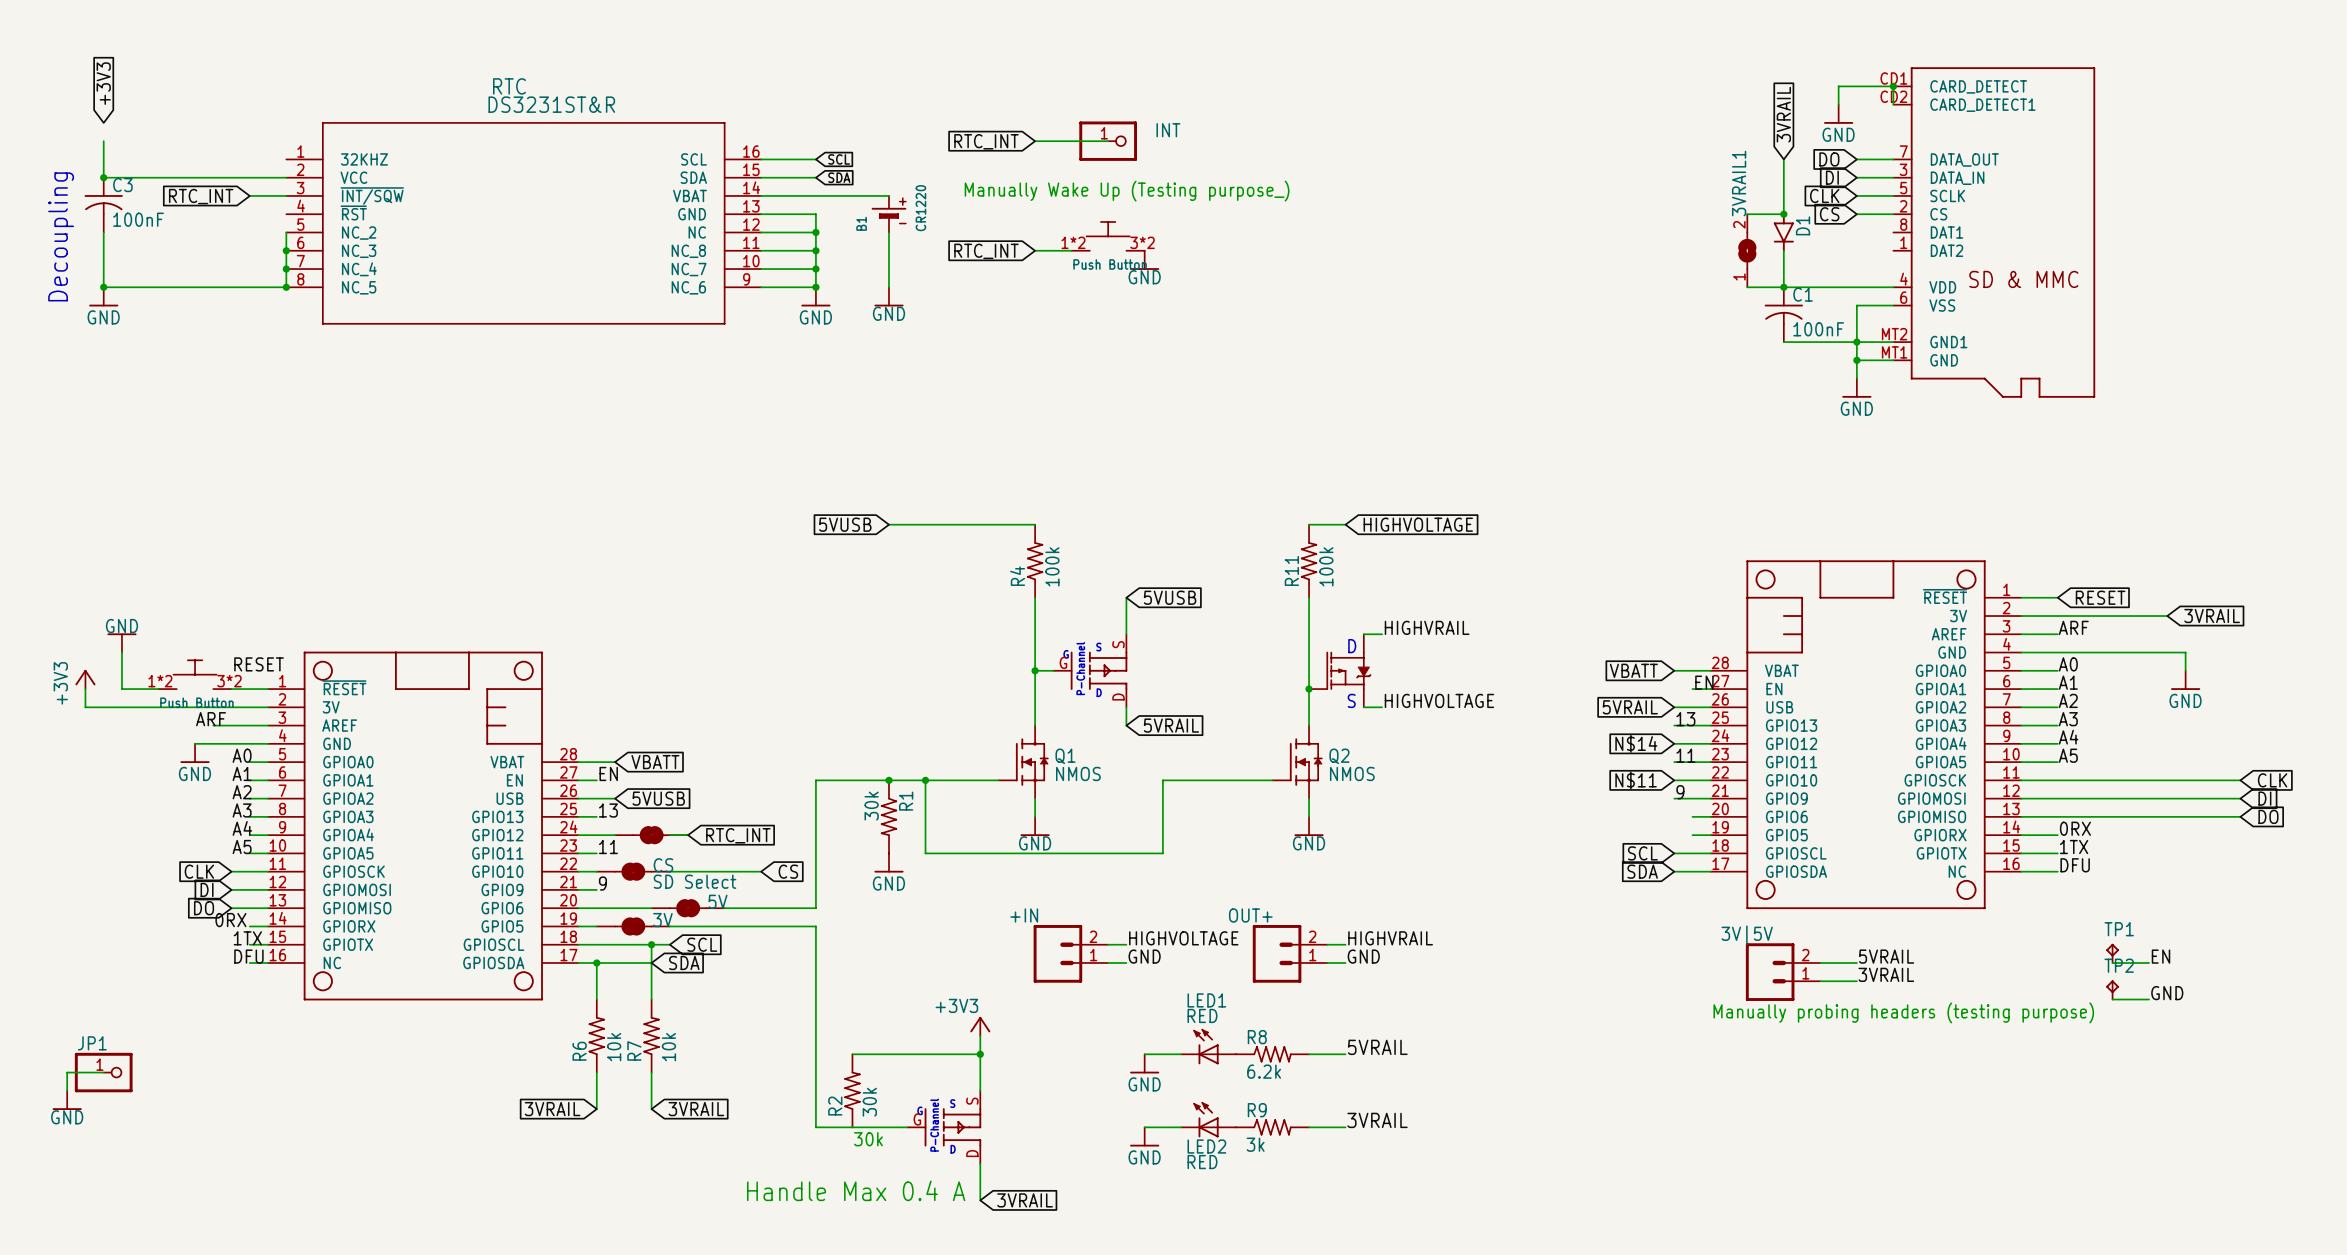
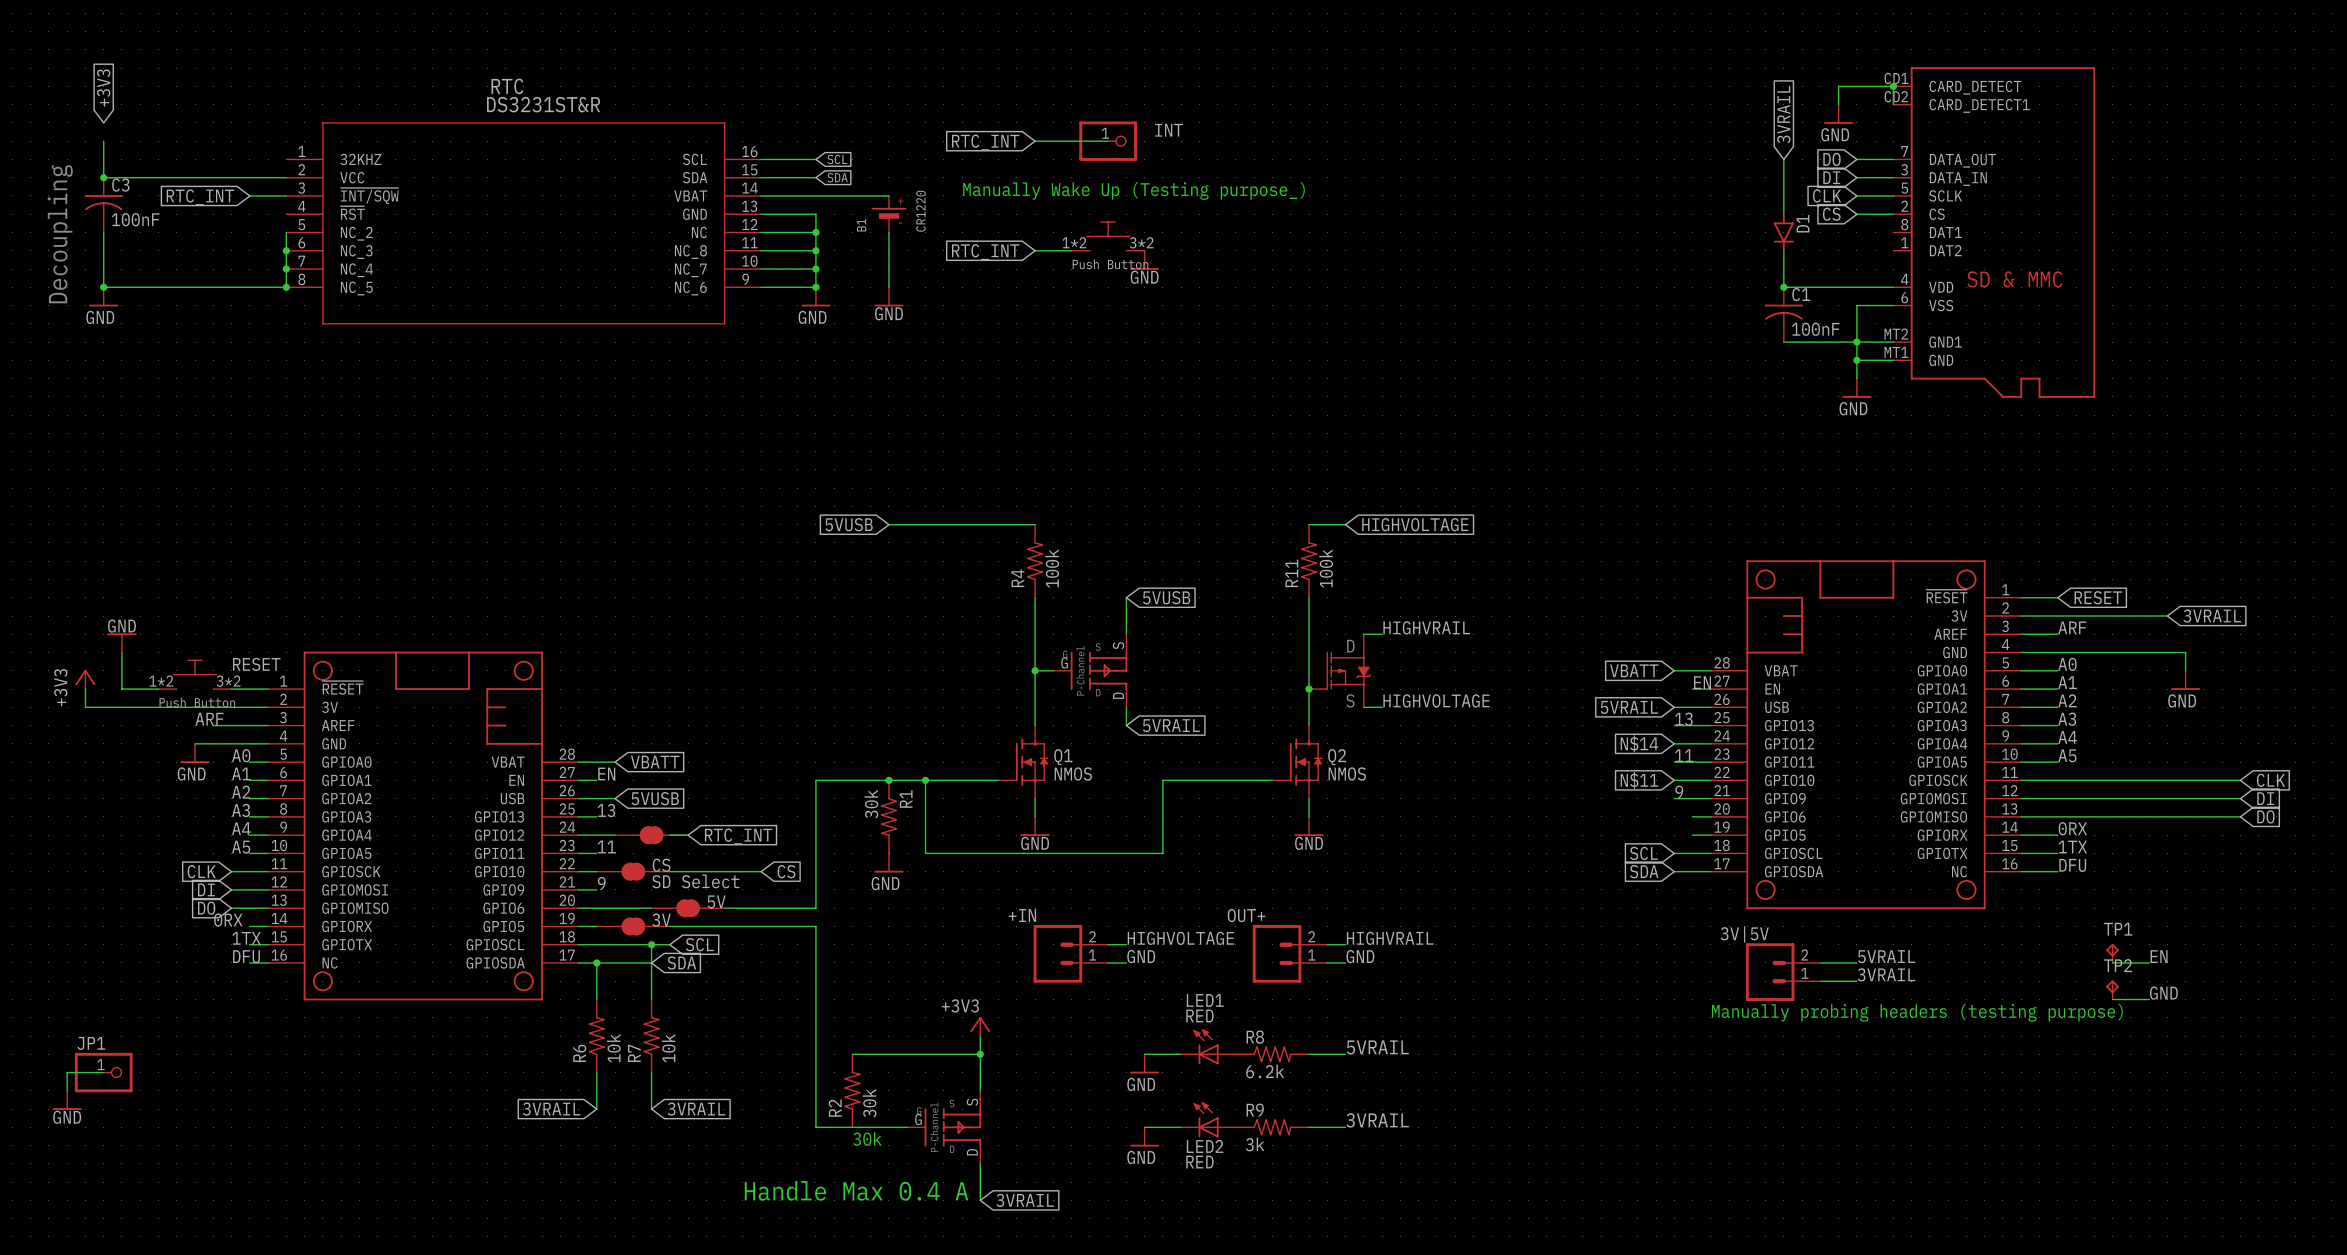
wire: (1747, 214) (1783, 214) -> none
junction: (1783, 214) -> none
3VRAIL1: (1747, 250) -> none
wire: (1747, 287) (1783, 287) -> none

